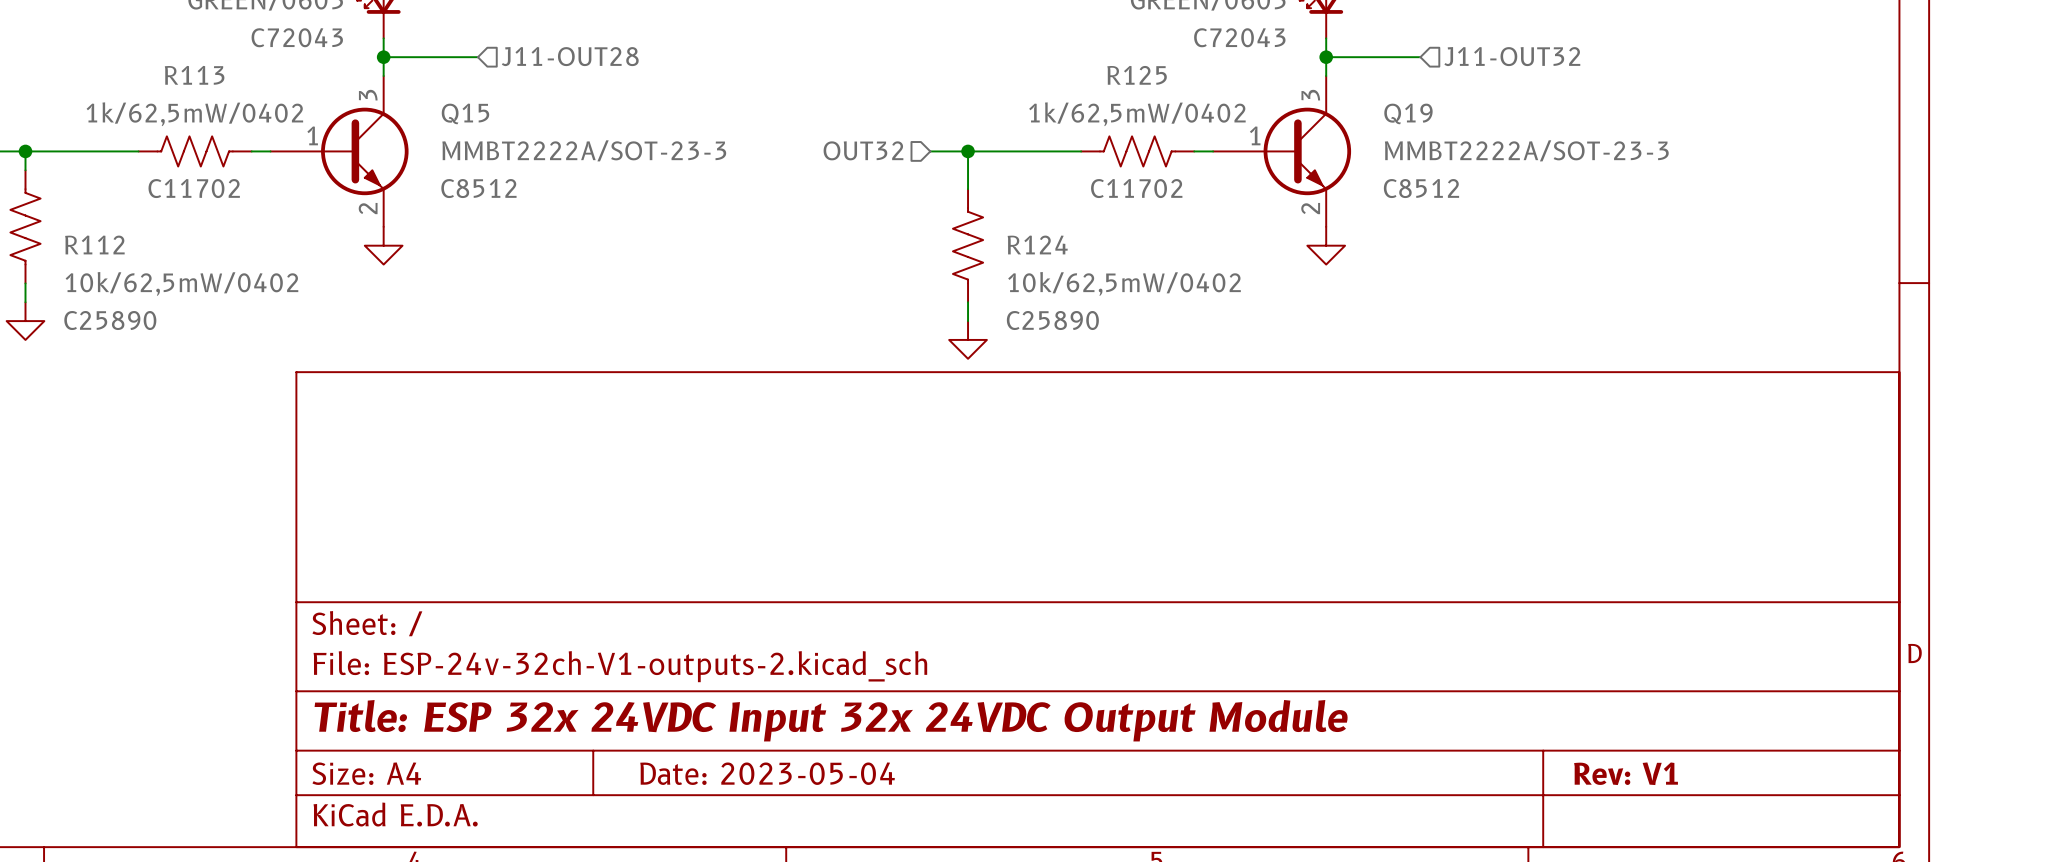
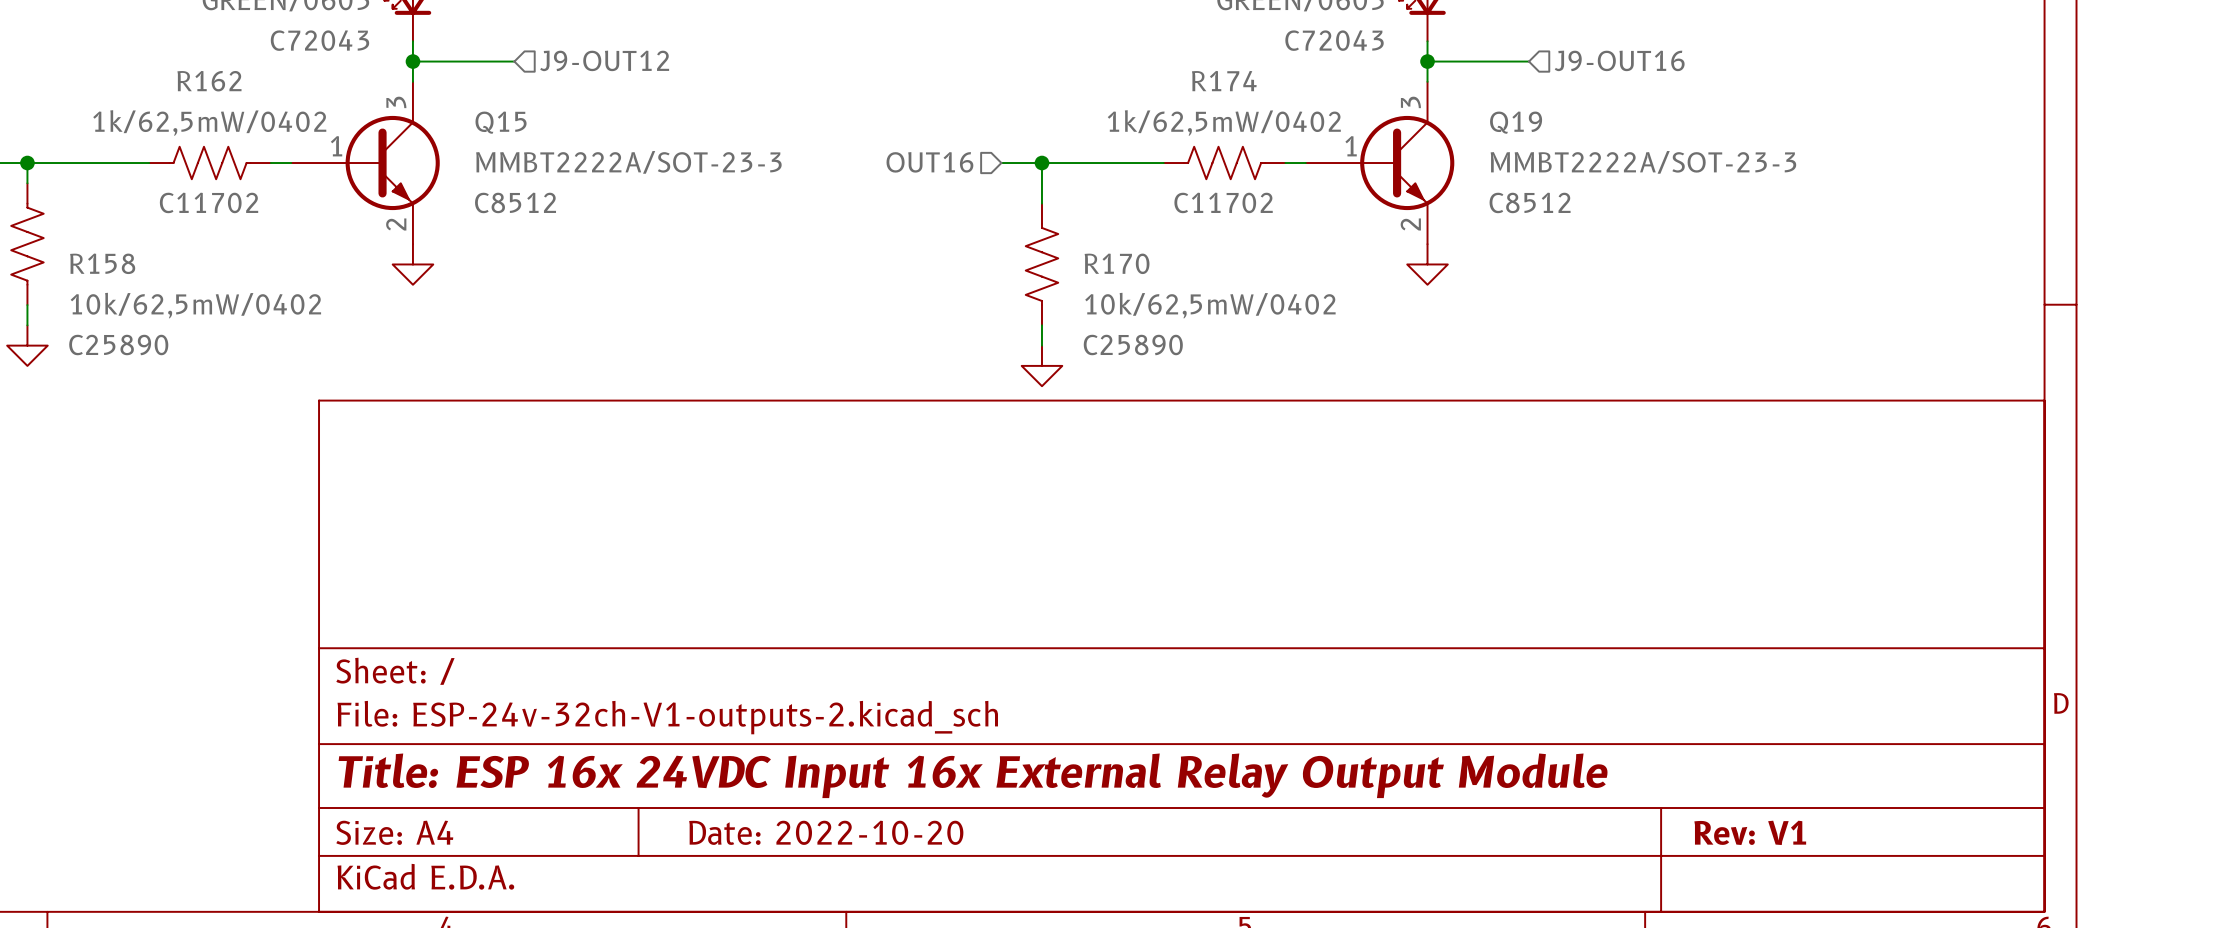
hierarchical label: J11-OUT28 (570, 56) -> J9-OUT12 (604, 60)
hierarchical label: J11-OUT32 (1512, 56) -> J9-OUT16 (1619, 60)
R113 name: R113 (194, 75) -> R162 (209, 81)
R125 name: R125 (1137, 75) -> R174 (1224, 81)
hierarchical label: OUT32 (863, 150) -> OUT16 (929, 162)
R112 name: R112 (94, 244) -> R158 (102, 263)
R124 name: R124 (1037, 244) -> R170 (1117, 263)
title block: Title: ESP 32x 24VDC Input 32x 24VDC Output Module (831, 720) -> Title: ESP 16x 24VDC Input 16x External Relay Output Module (973, 775)
title block: Date: 2023-05-04 (767, 773) -> Date: 2022-10-20 (826, 832)

